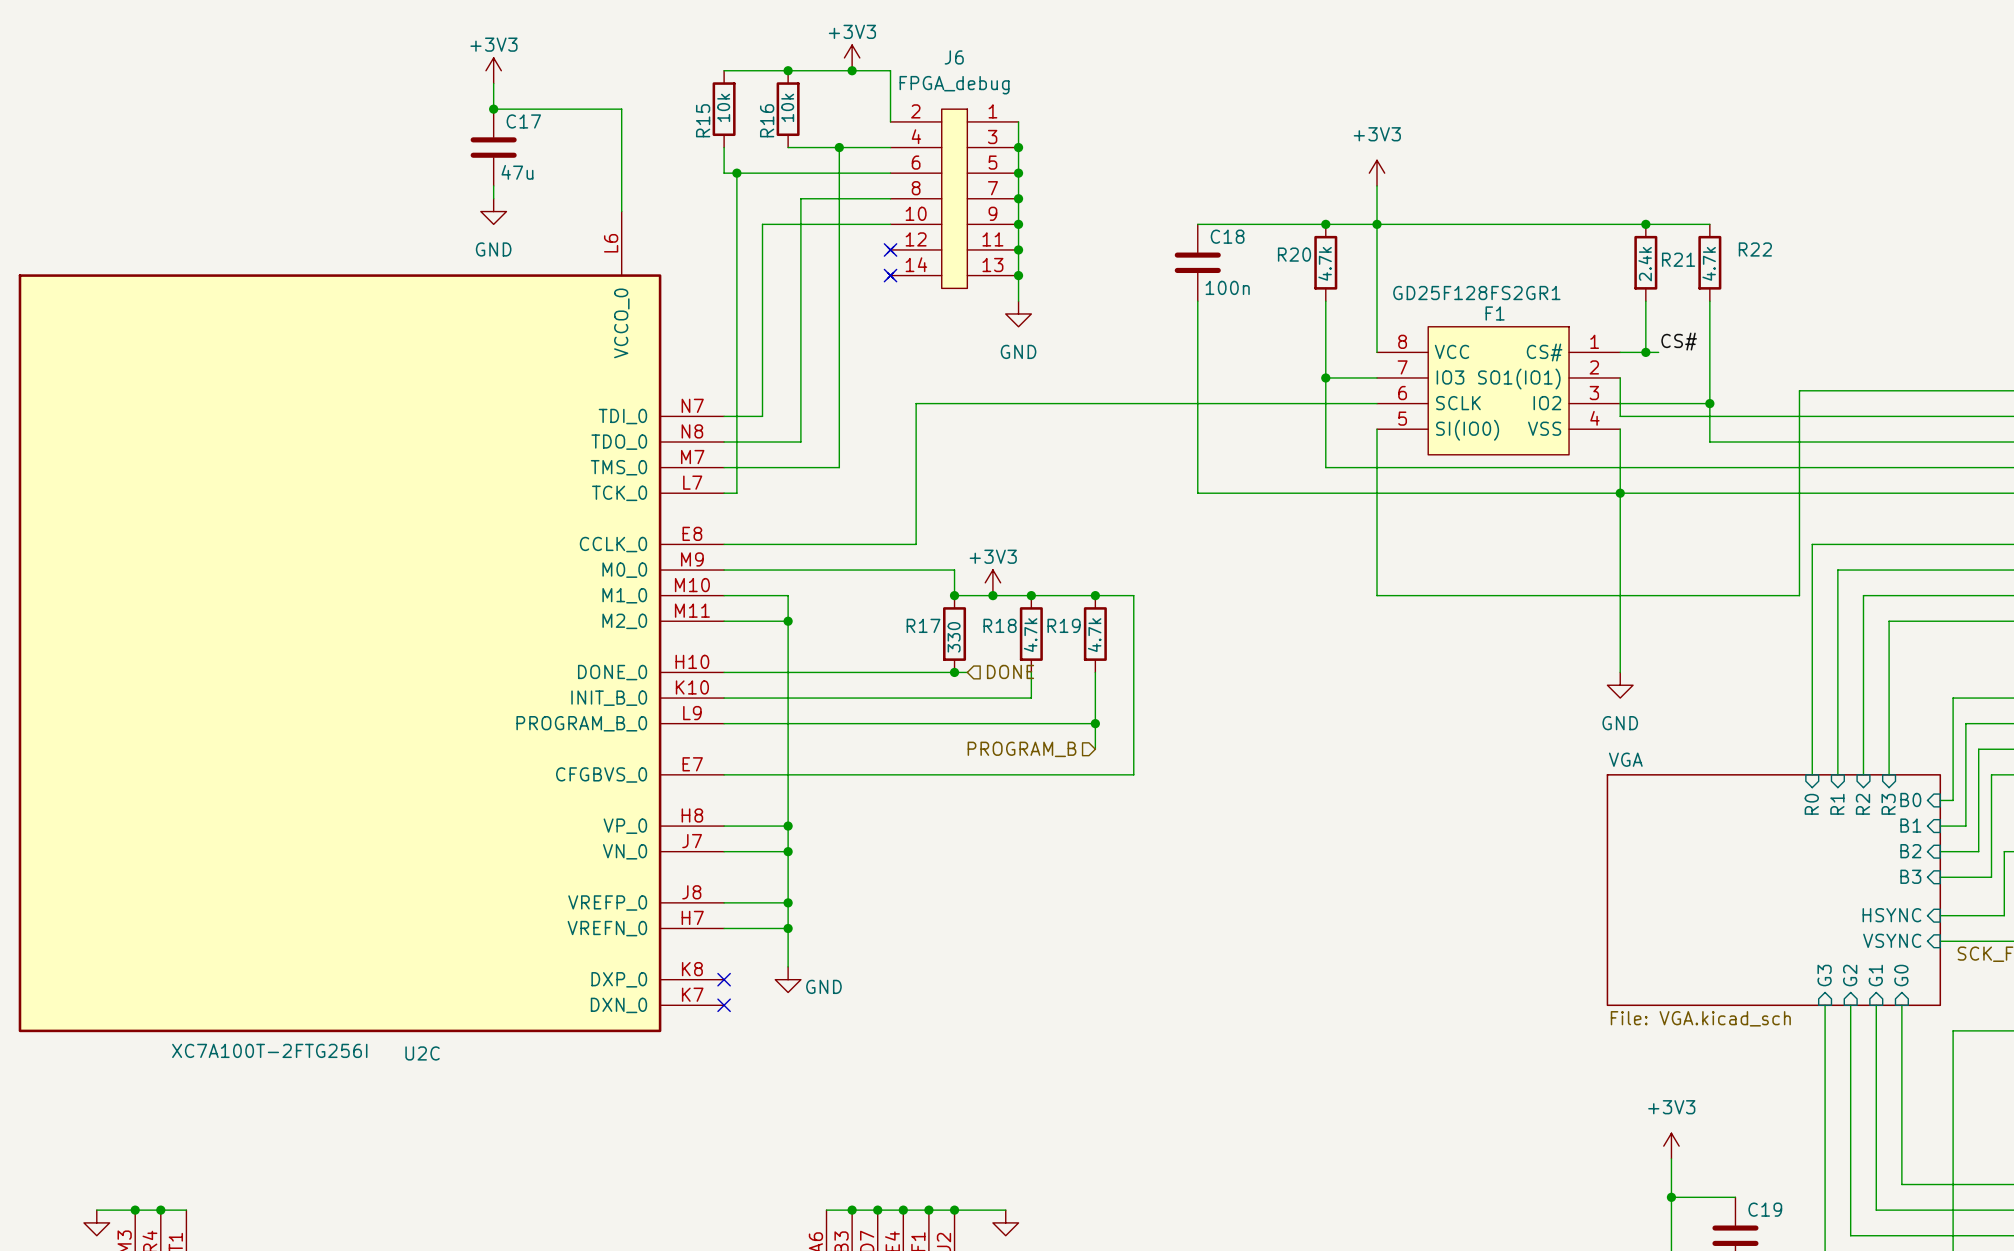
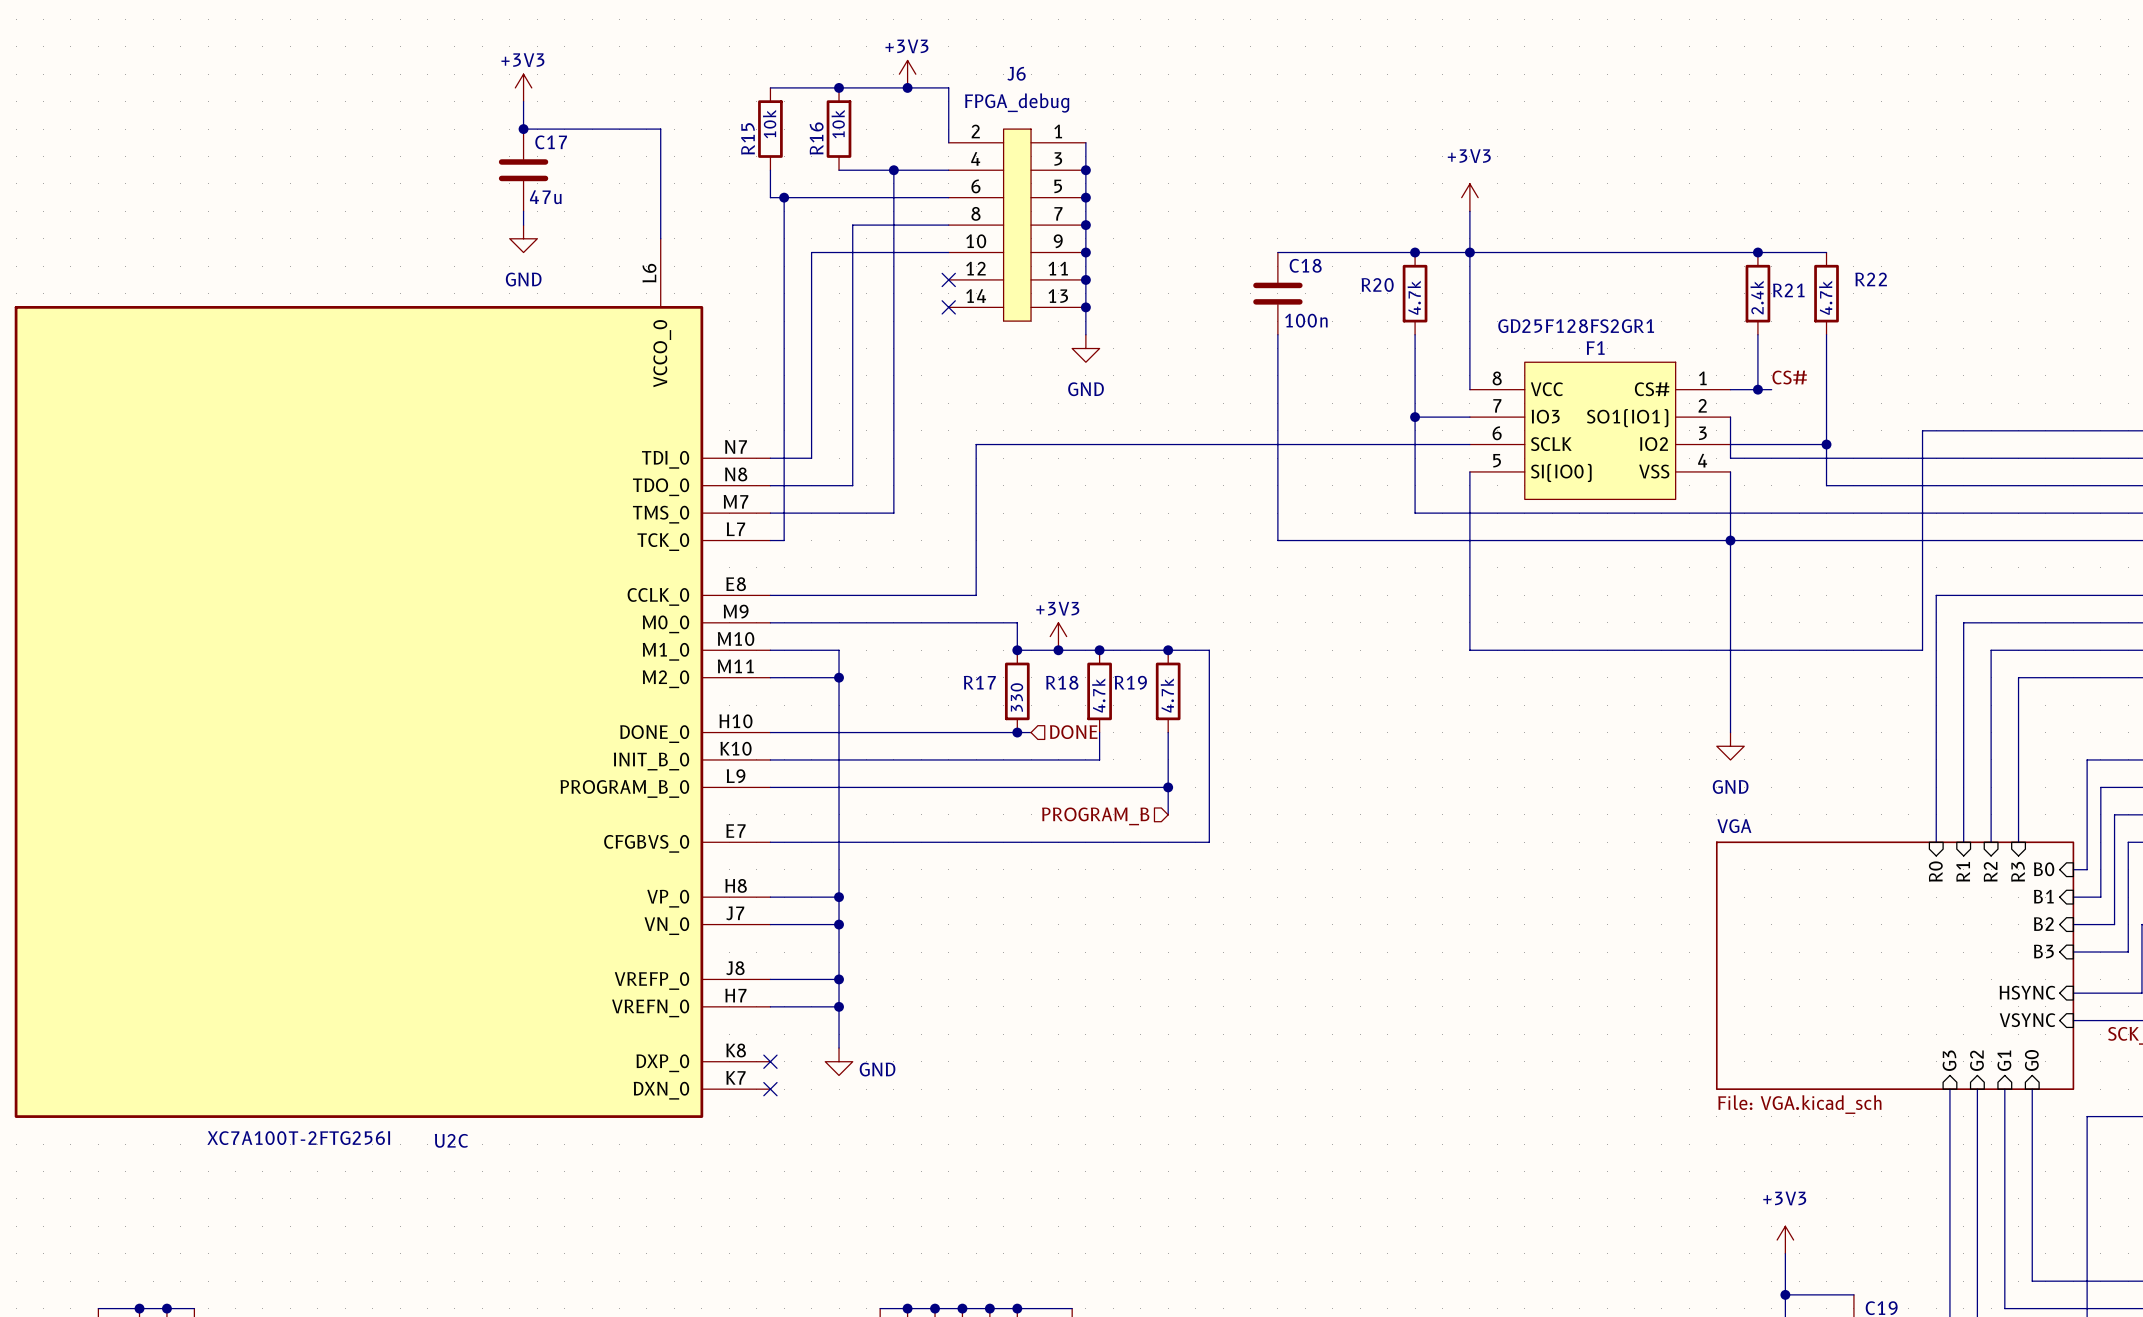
J6 symbol: [887, 109, 1019, 289] -> [948, 129, 1086, 322]

